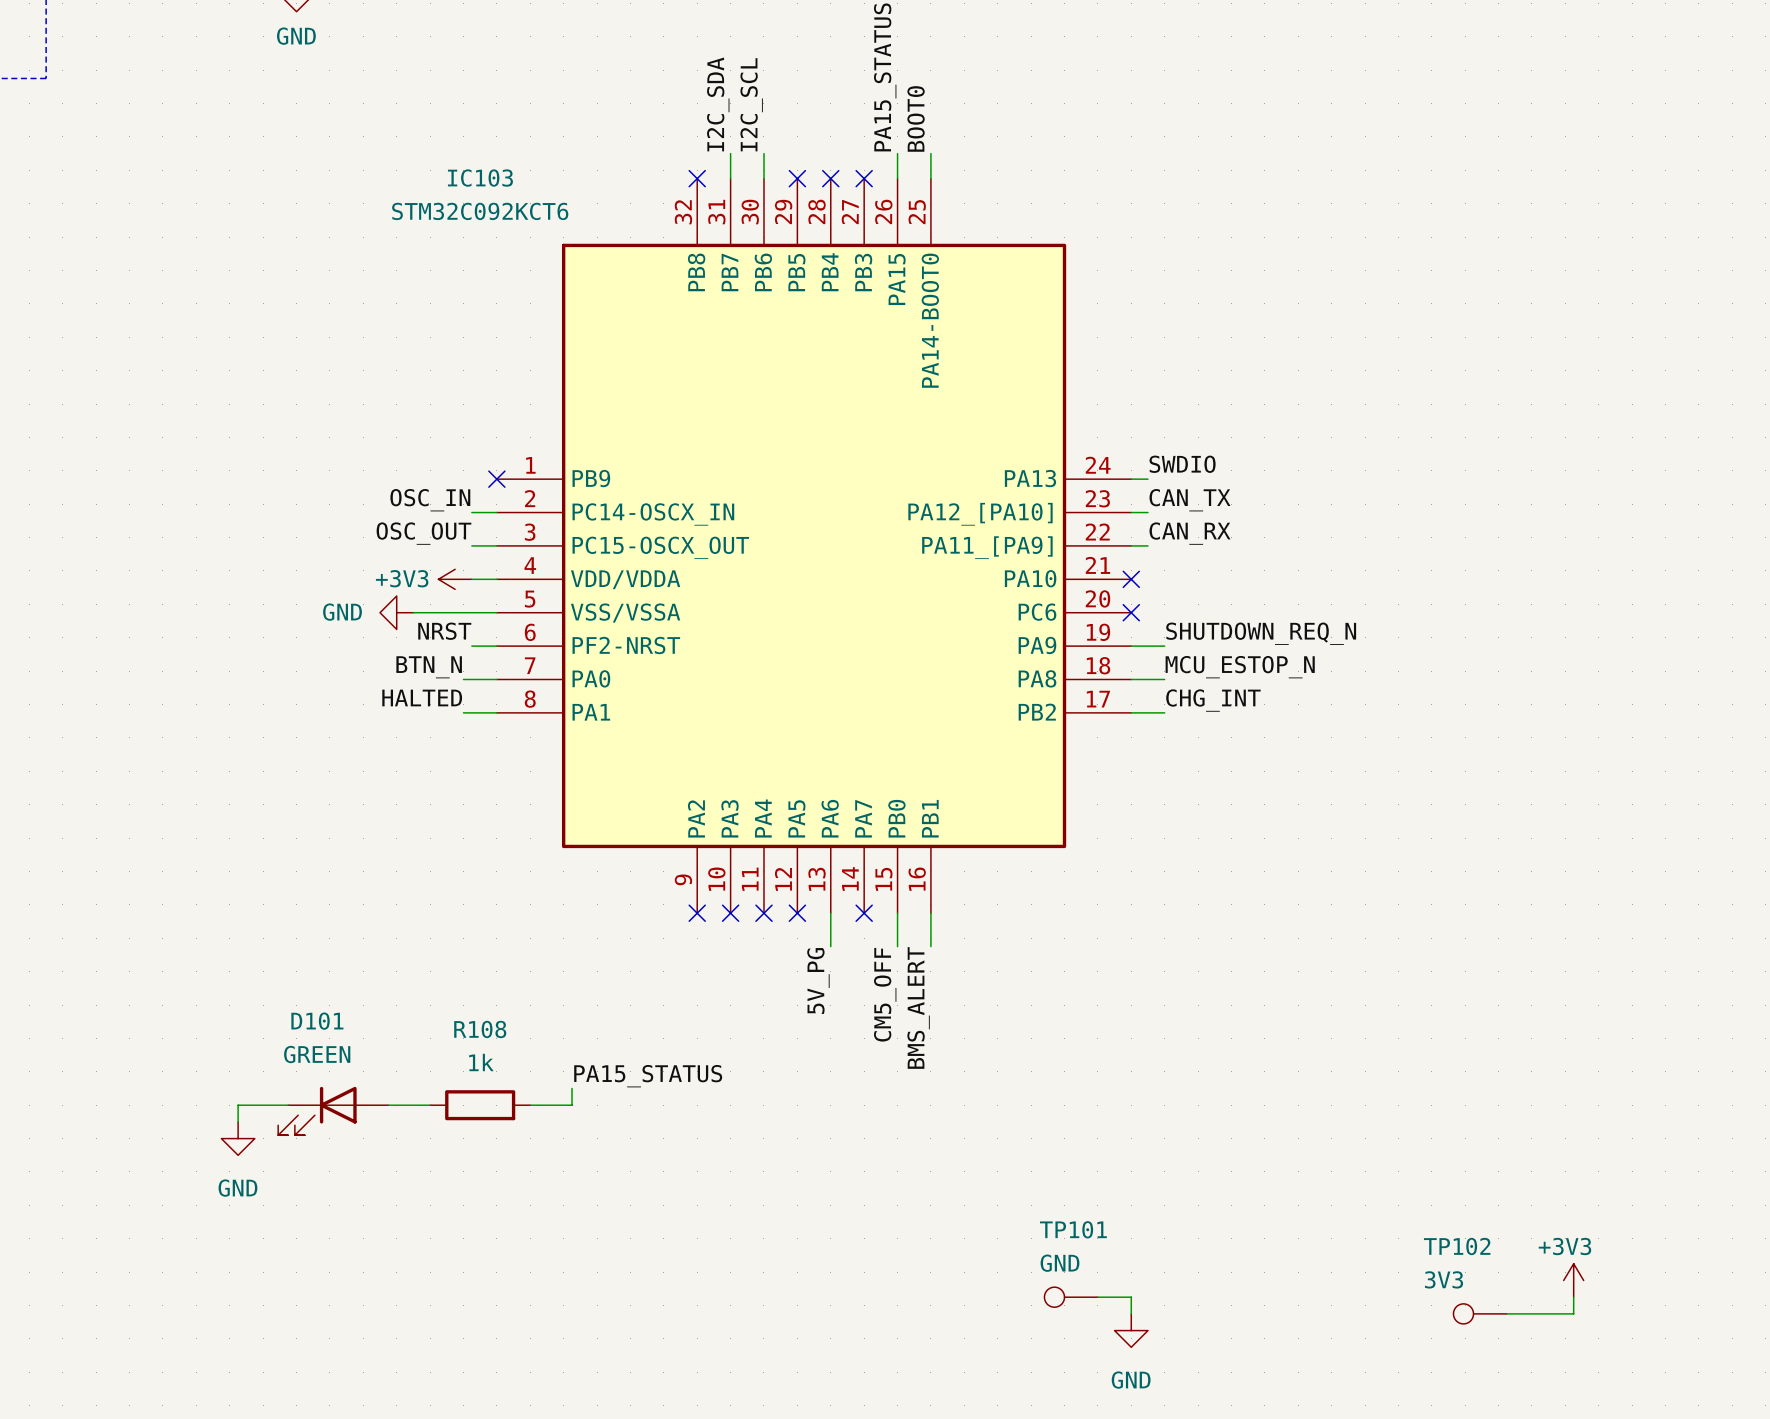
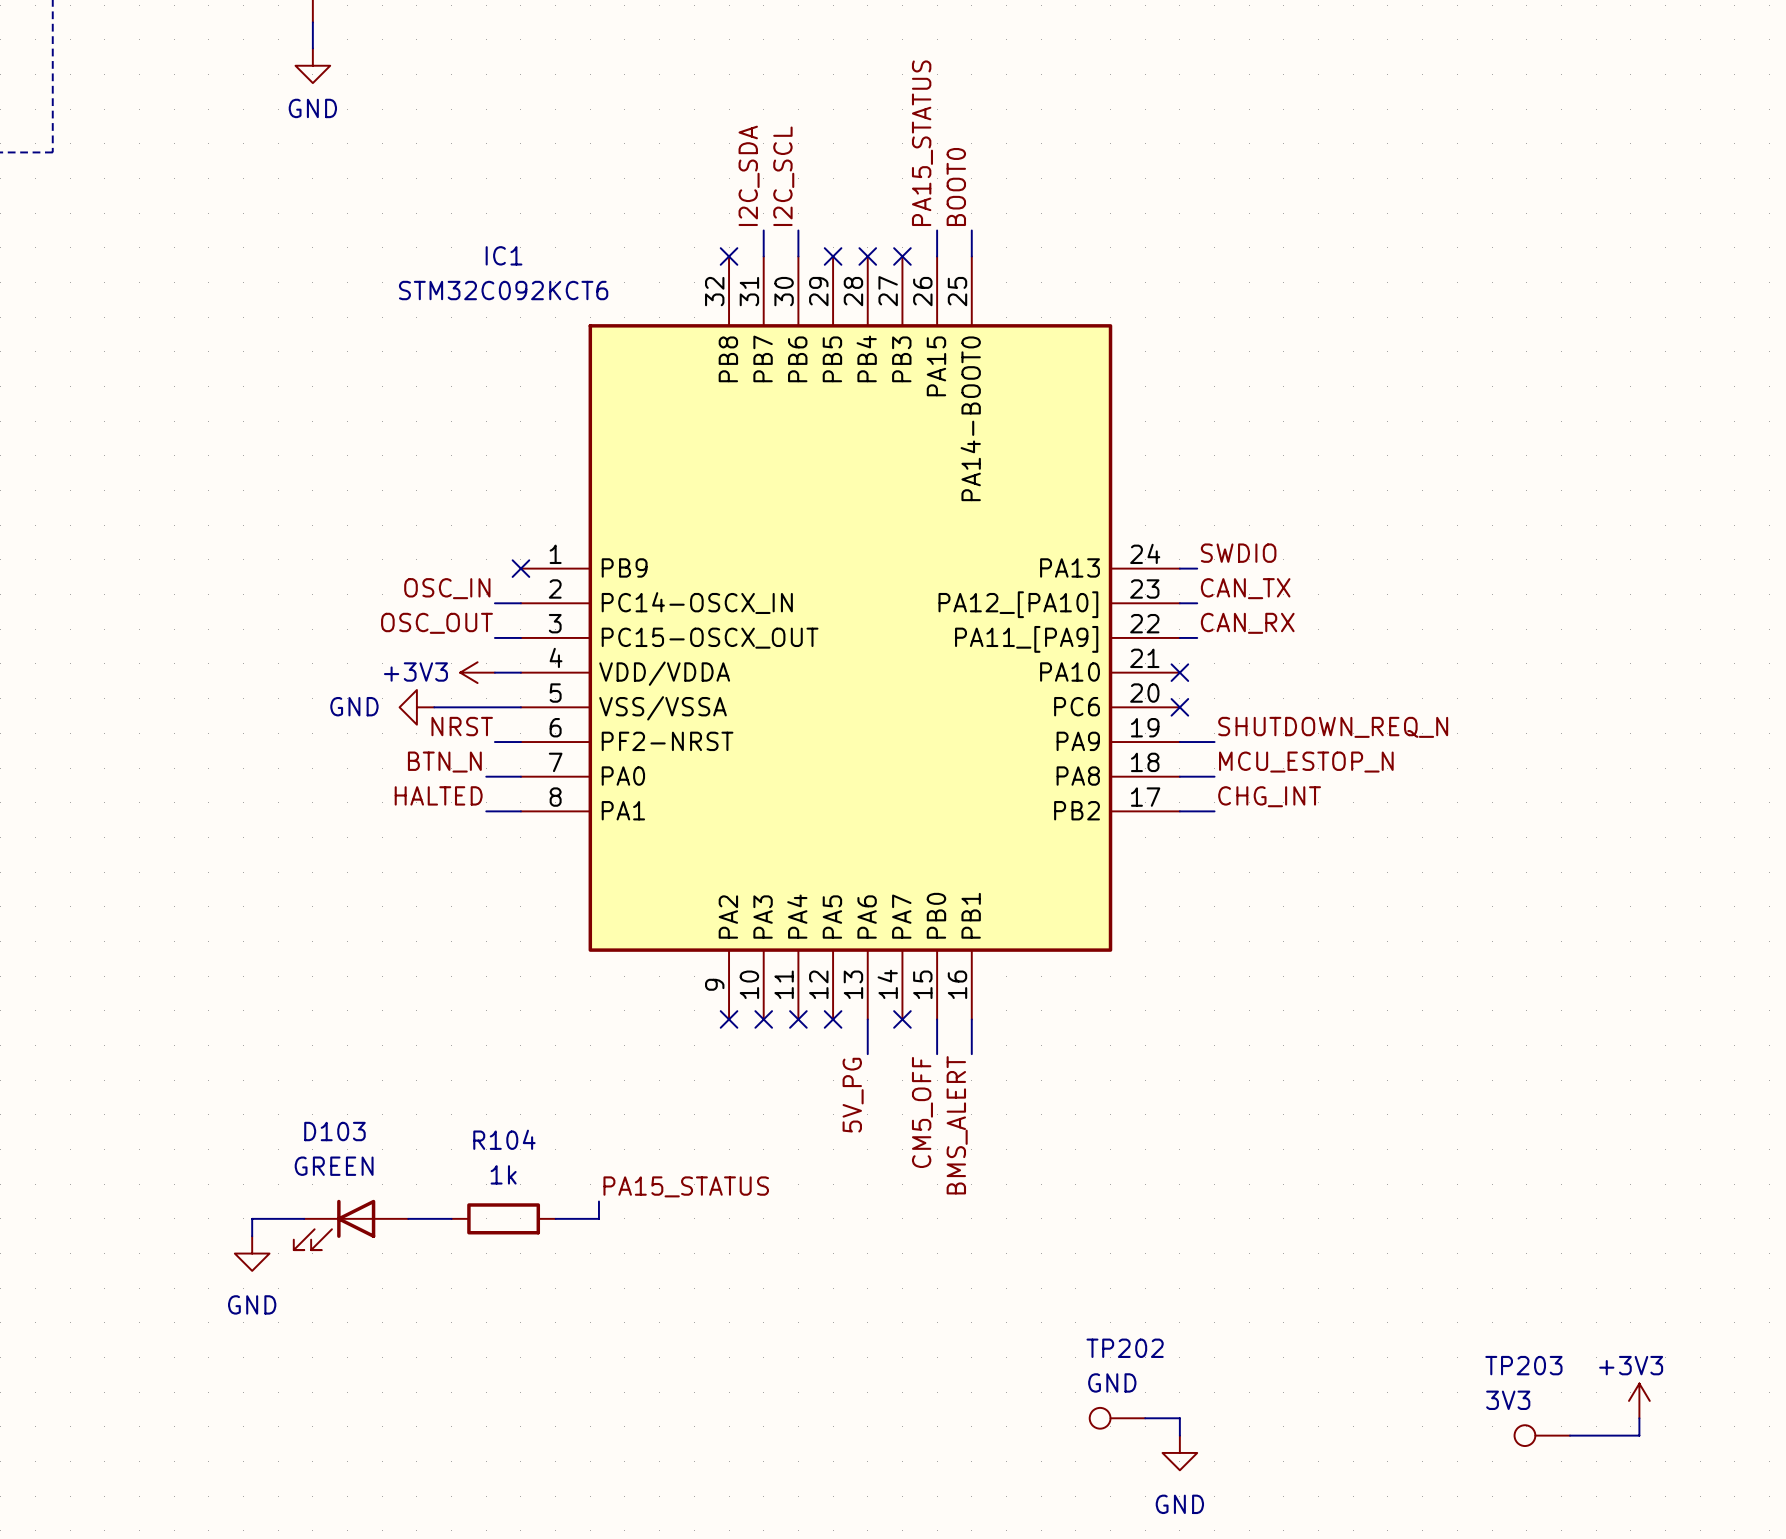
IC103 name: IC103 (480, 178) -> IC1 (504, 255)
D101 name: D101 (317, 1021) -> D103 (334, 1131)
R108 name: R108 (480, 1029) -> R104 (504, 1139)
TP101 name: TP101 (1073, 1229) -> TP202 (1125, 1348)
TP102 name: TP102 (1457, 1246) -> TP203 (1523, 1365)

